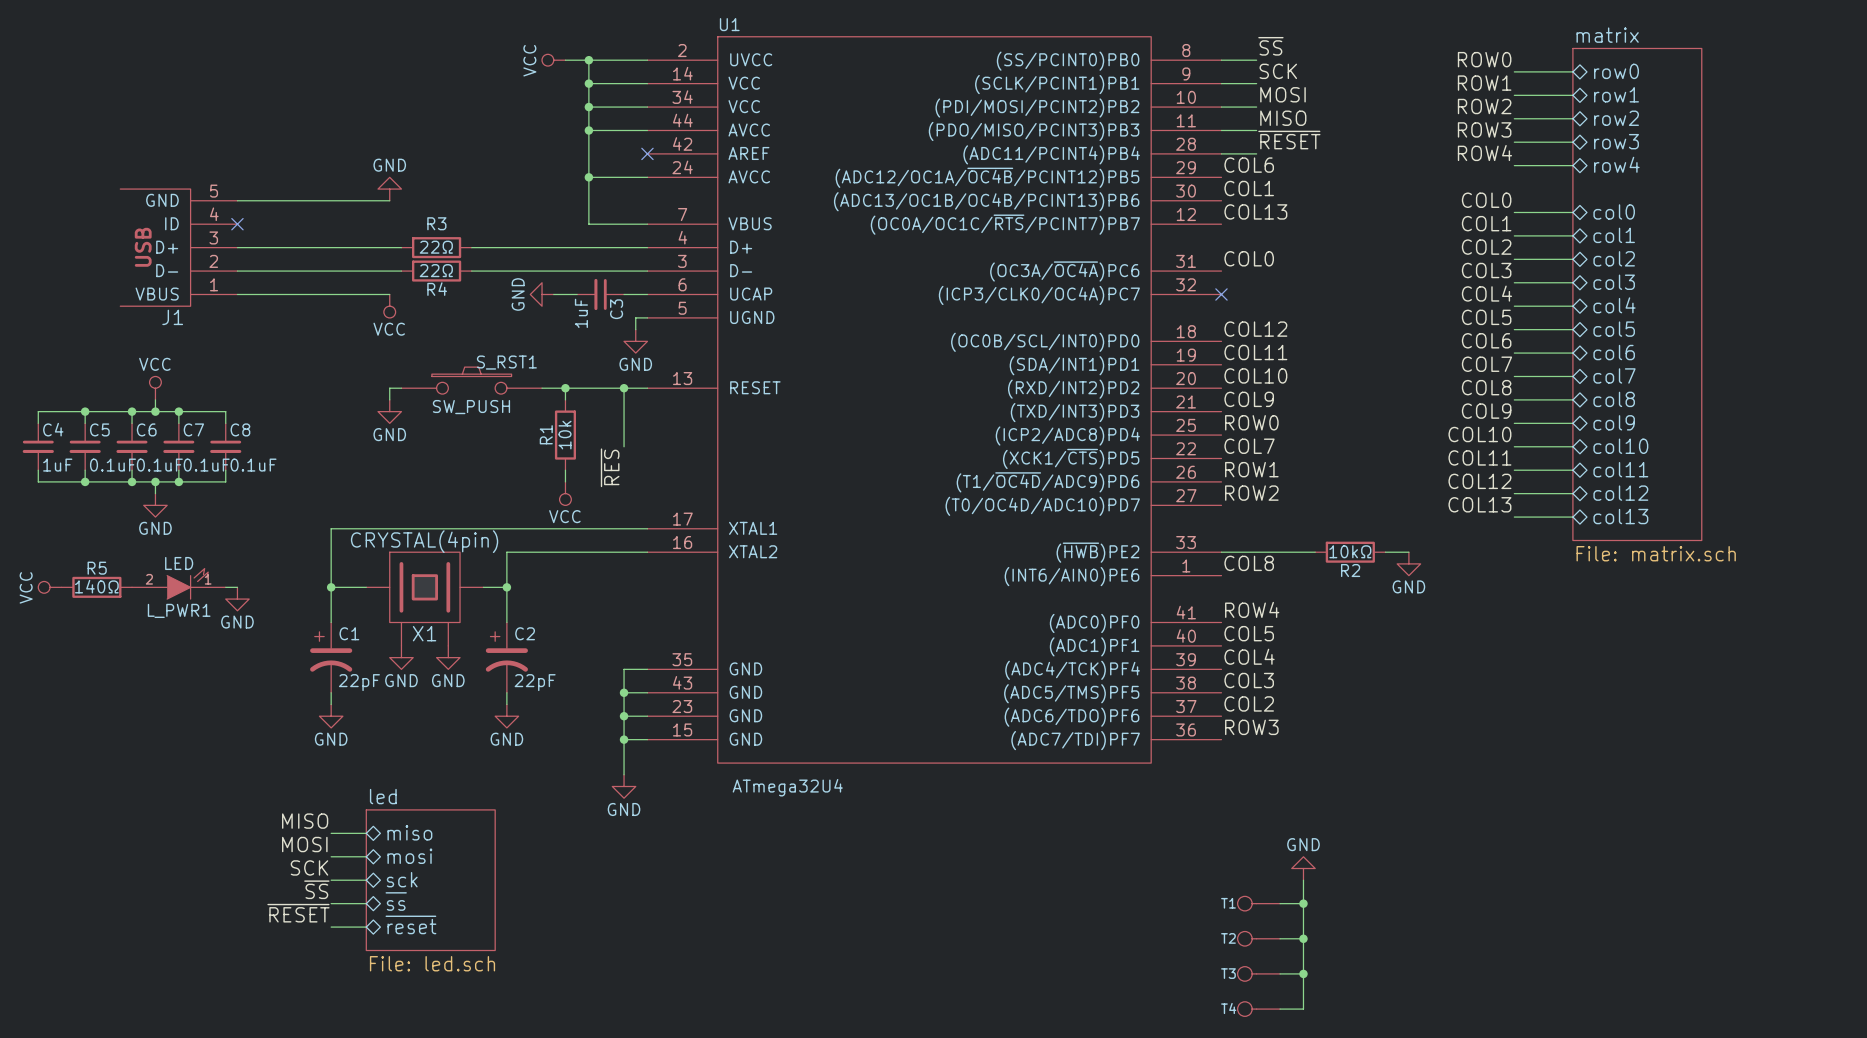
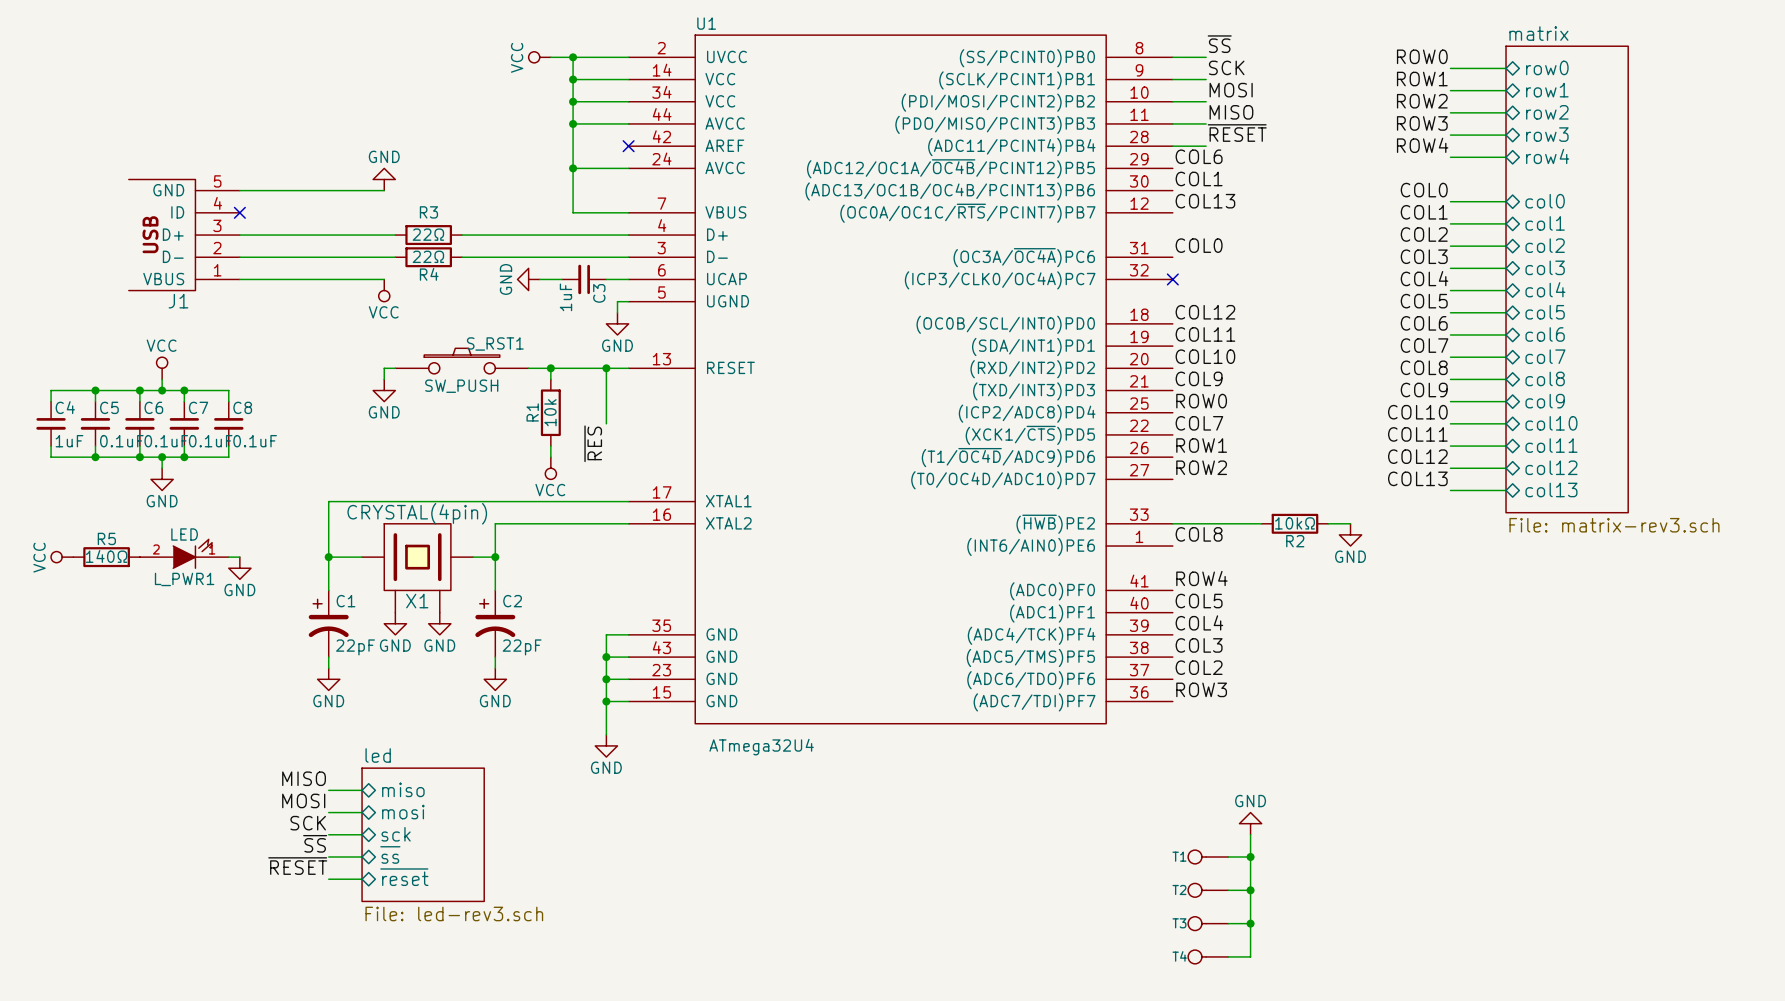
sheet matrix value: File: matrix.sch (1656, 553) -> File: matrix-rev3.sch (1614, 525)
sheet led value: File: led.sch (432, 963) -> File: led-rev3.sch (454, 913)

